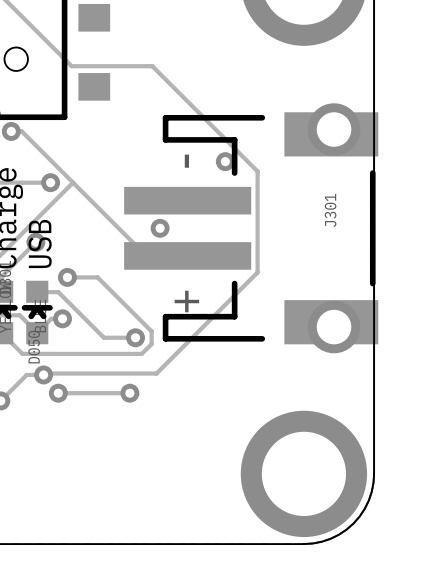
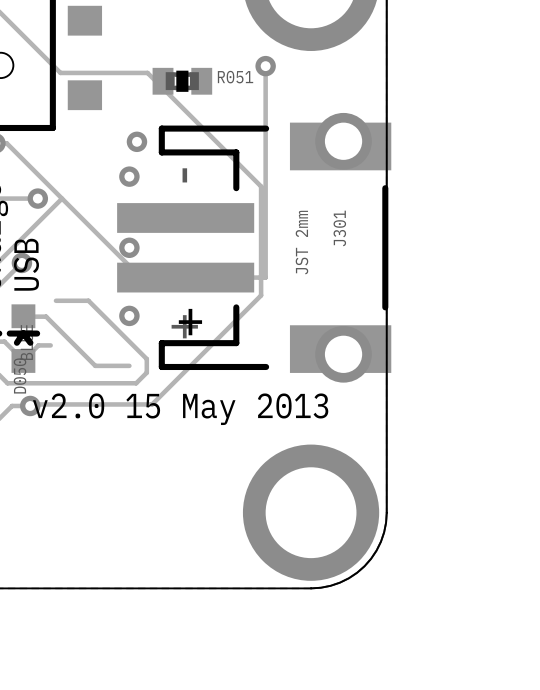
track: none -> (265, 66) (265, 277) (178, 277)
via: none -> (265, 66)
R051: none -> (182, 81)
via: none -> (136, 141)
via: (225, 161) -> none
via: none -> (129, 176)
J301 value: none -> JST 2mm (301, 242)
via position: (160, 228) -> (129, 247)
via: (67, 277) -> none
via: none -> (129, 315)
text: none -> + (190, 322)
via: (62, 318) -> none
via: (135, 337) -> none
text: none -> v2.0 15 May 2013 (180, 409)
track: (58, 393) (129, 393) -> none
via: (58, 393) -> none
via: (129, 393) -> none

